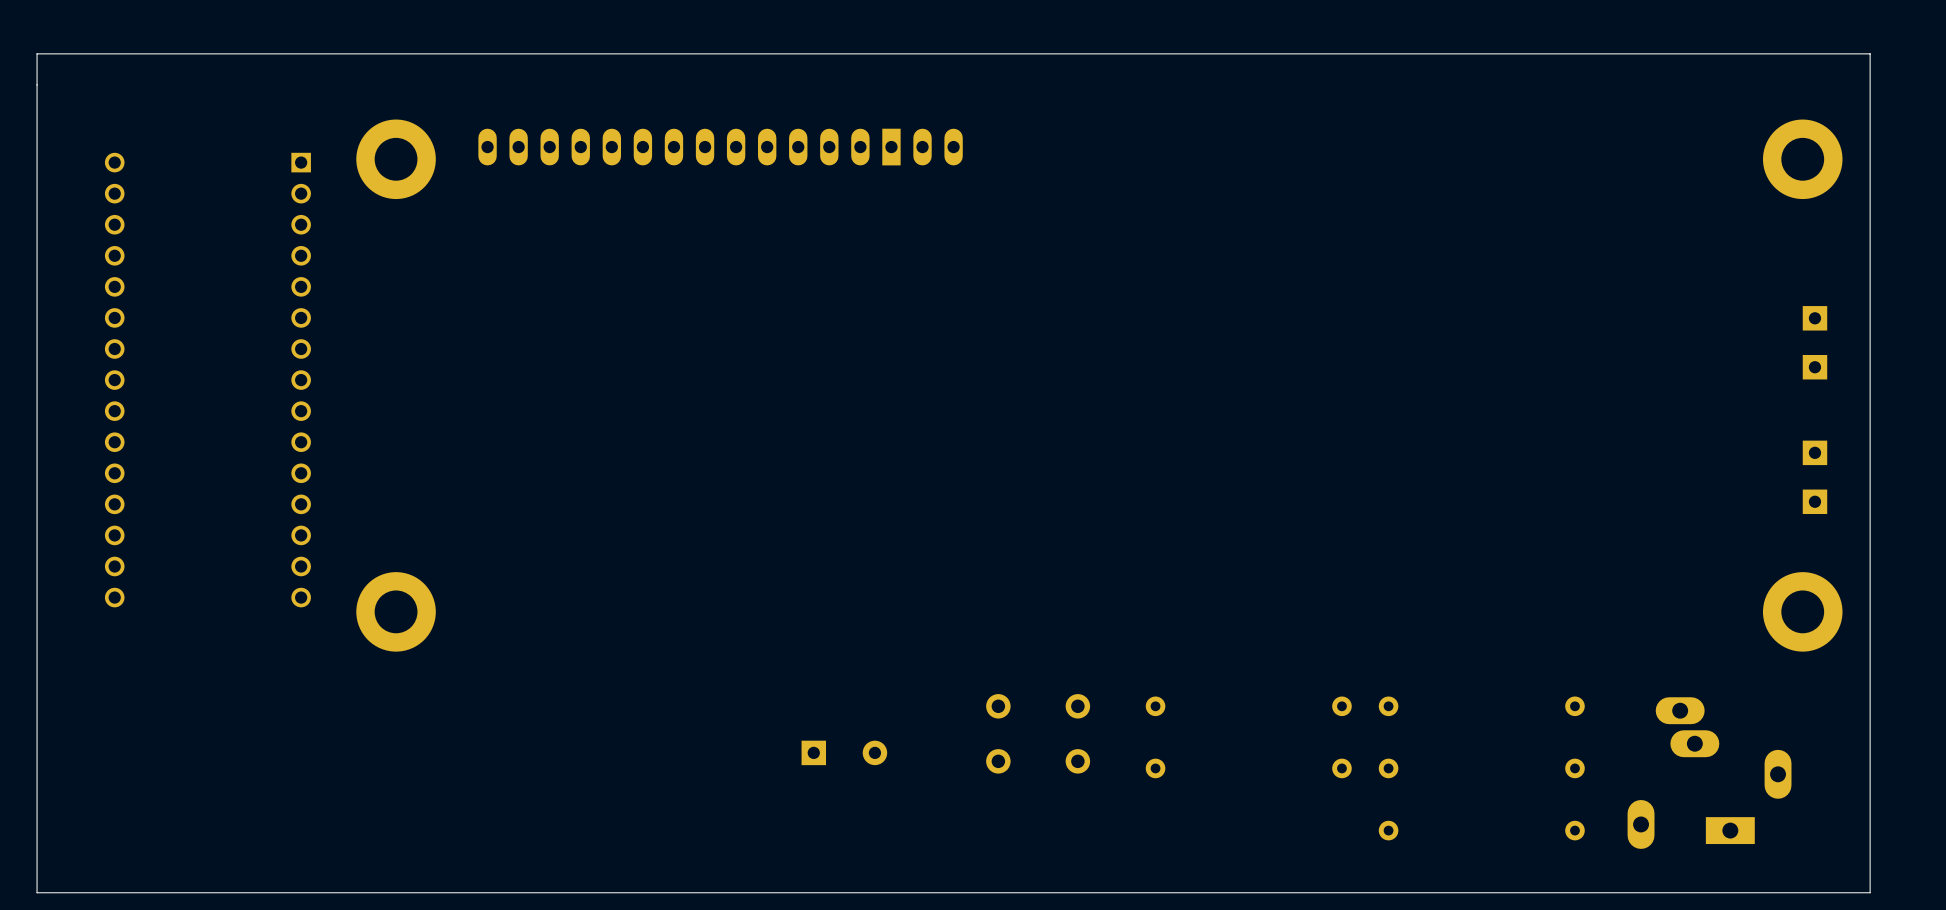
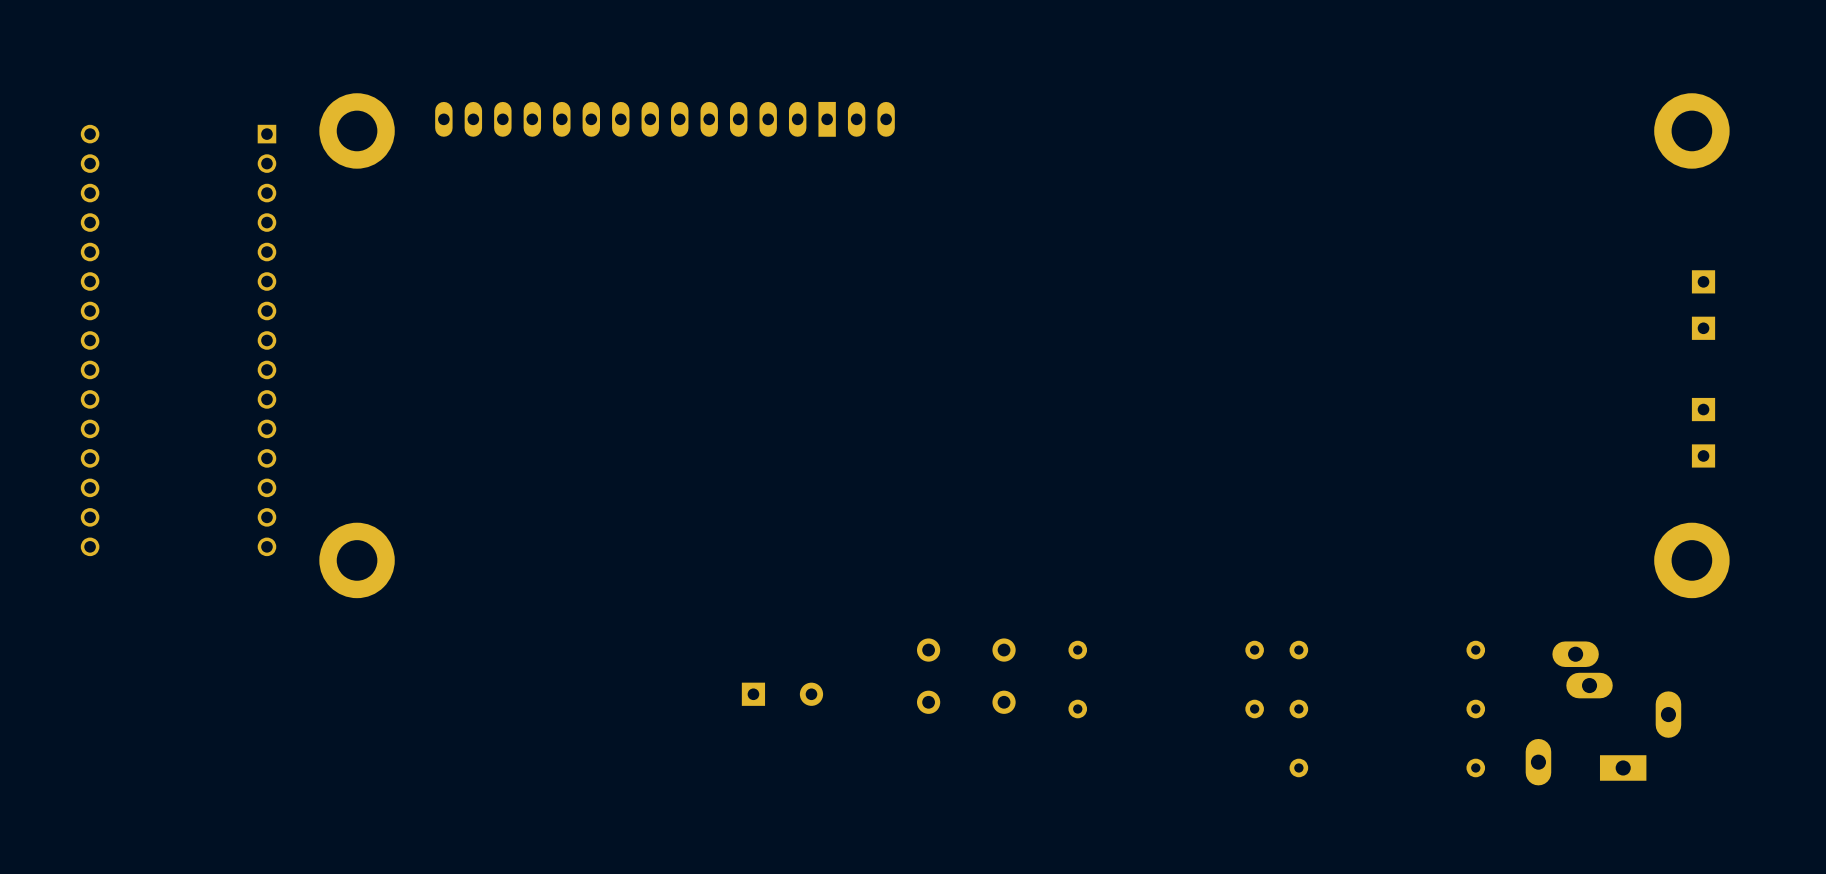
board edge: (1870, 53) (37, 53) (37, 892) (1870, 892) (1870, 53) -> none

